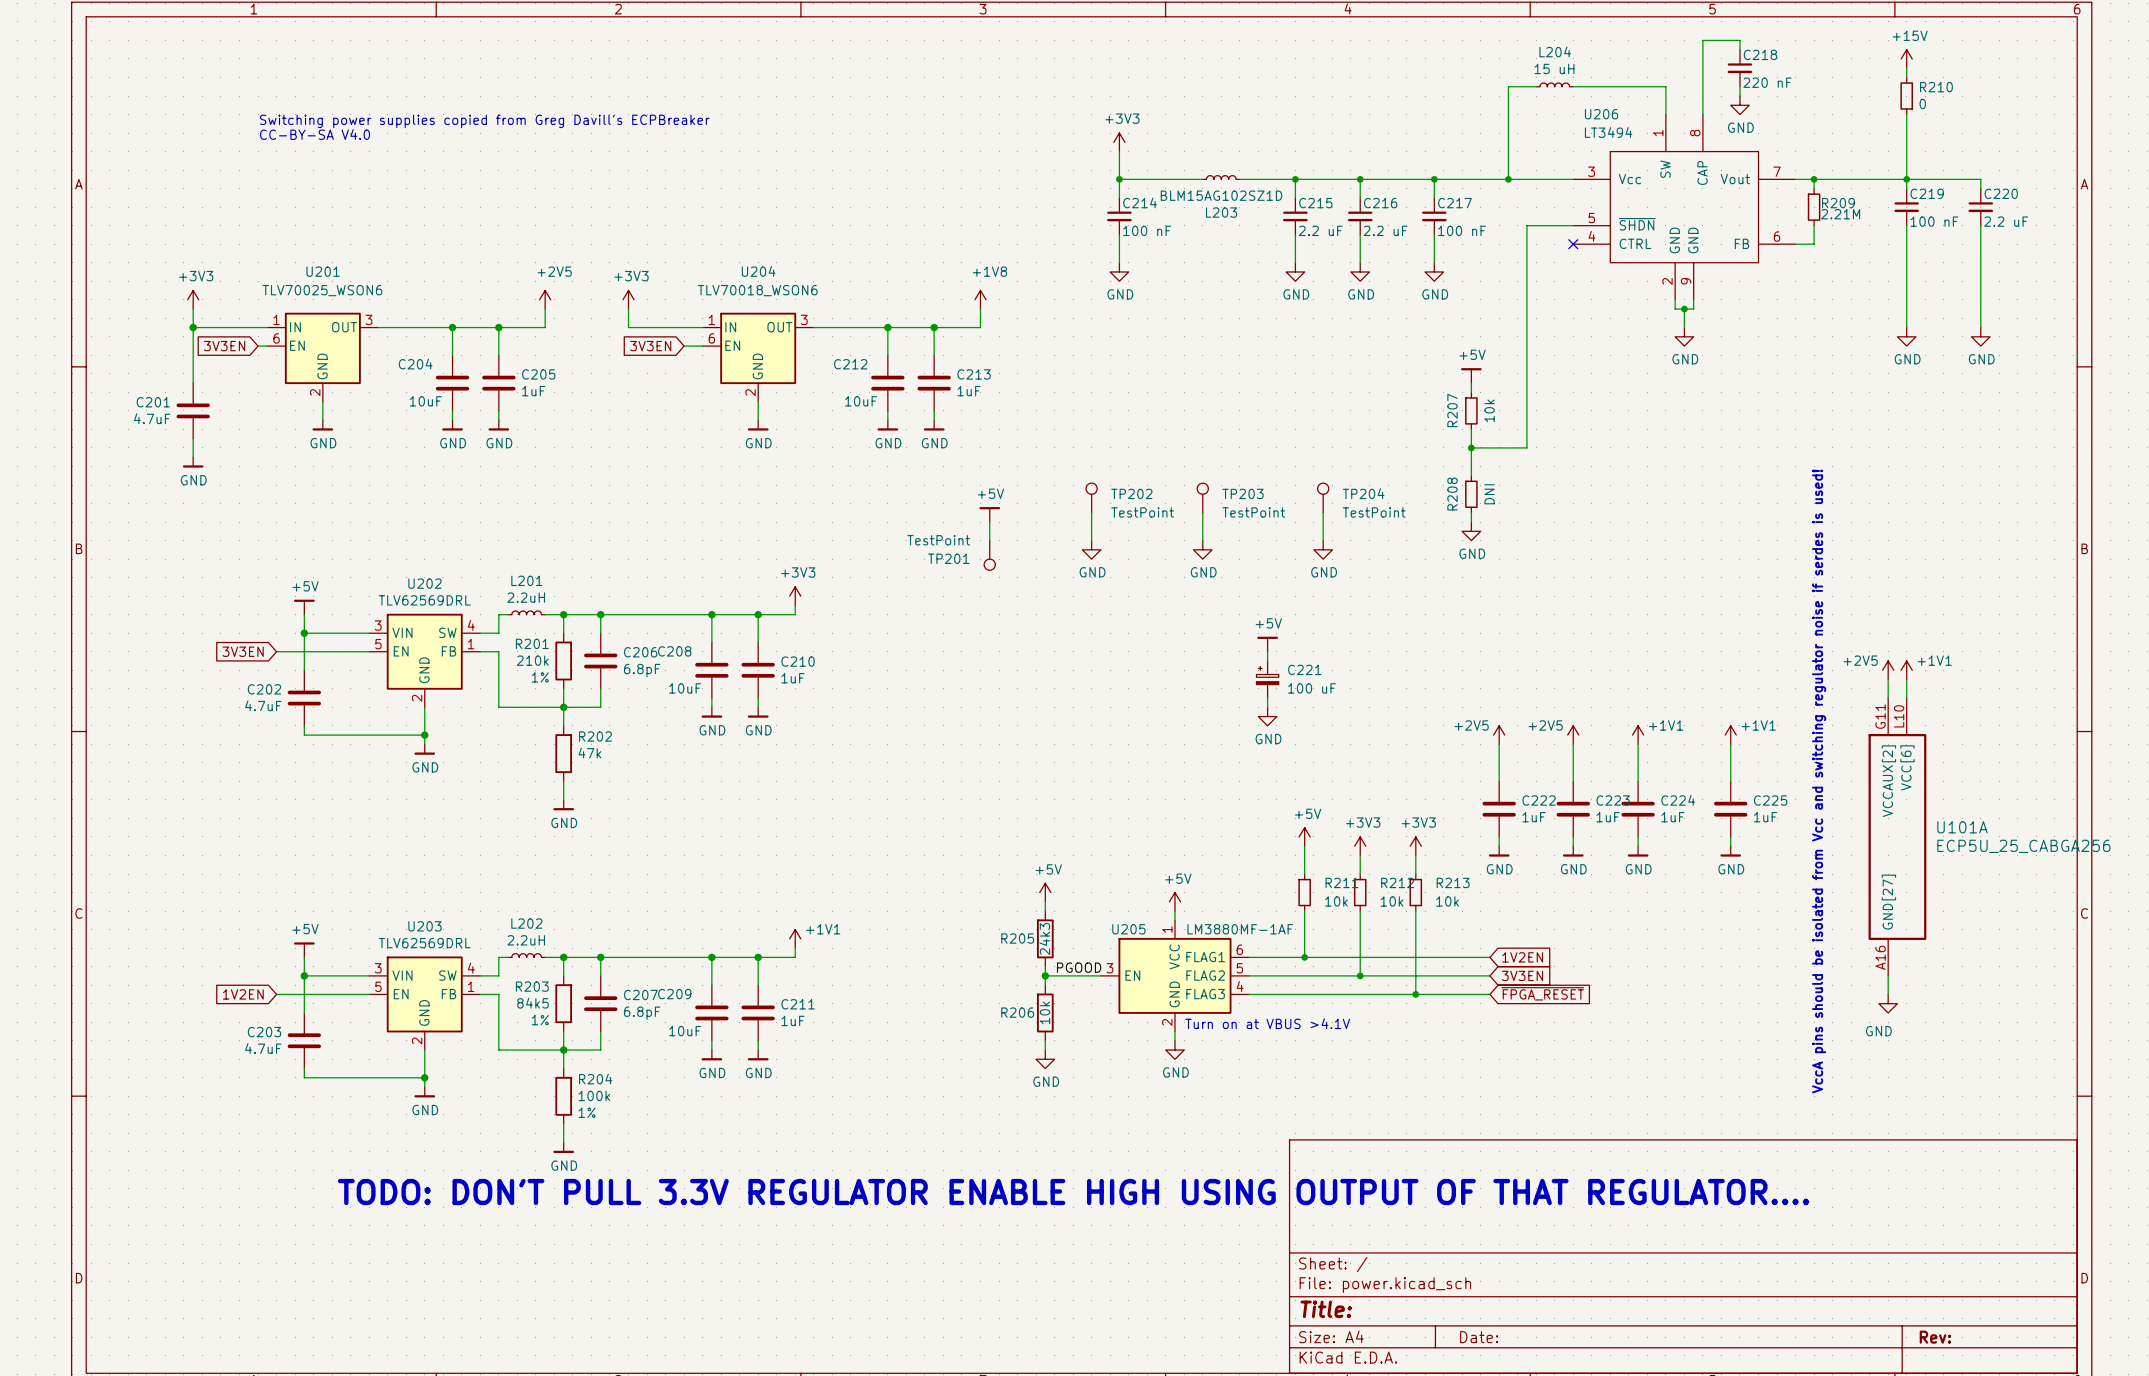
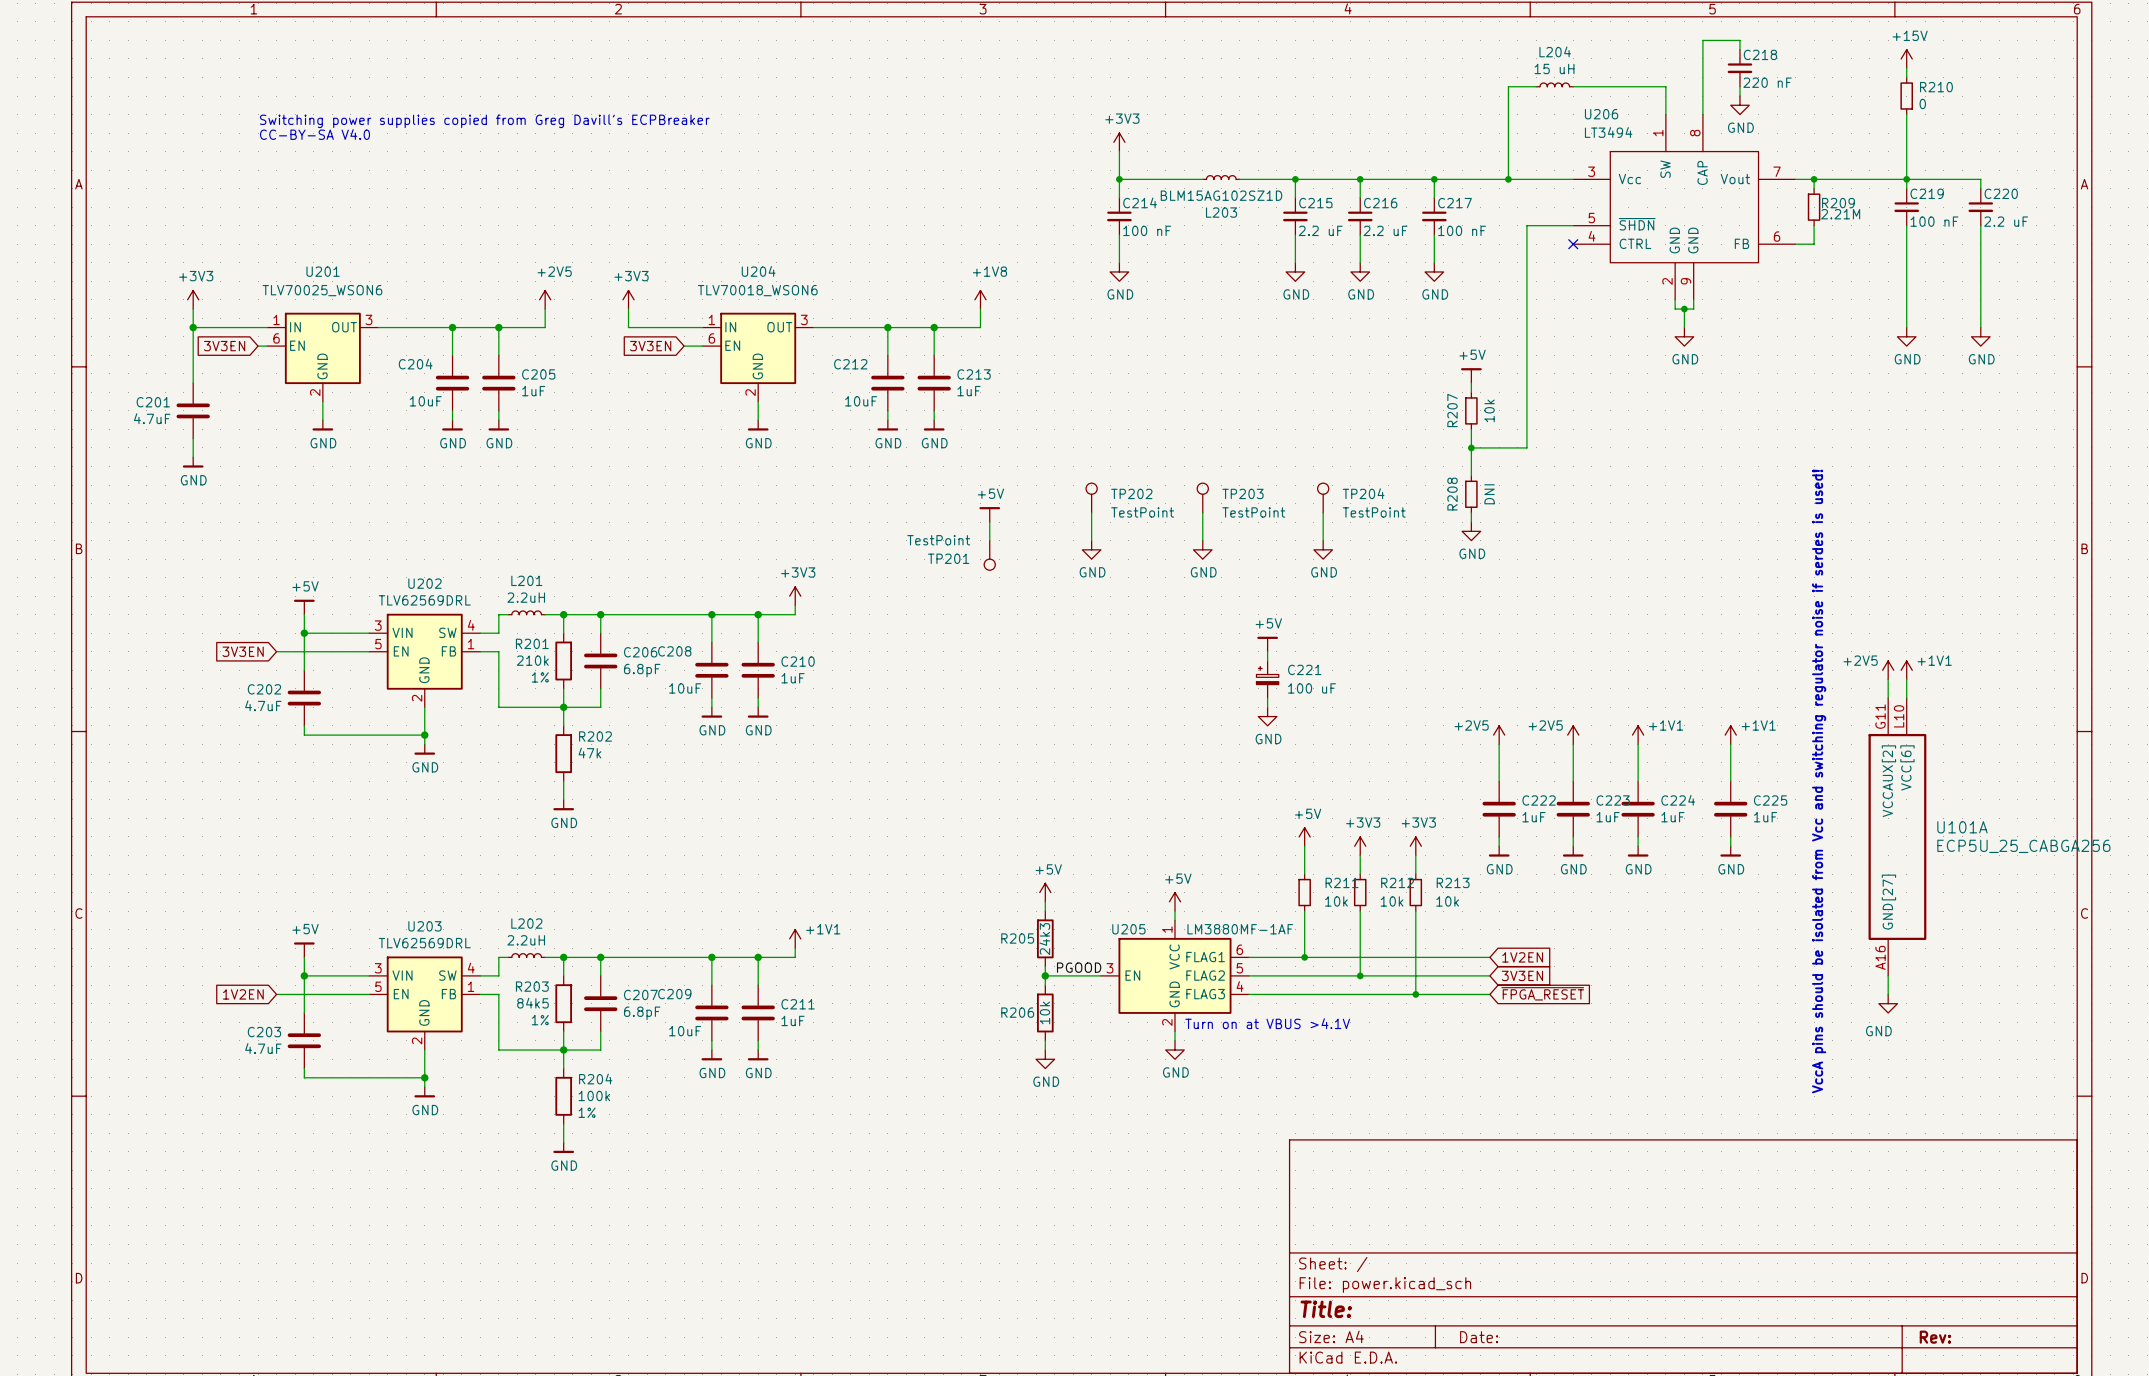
text: TODO: DON'T PULL 3.3V REGULATOR ENABLE HIGH USING OUTPUT OF THAT REGULATOR.... (1073, 1192) -> none

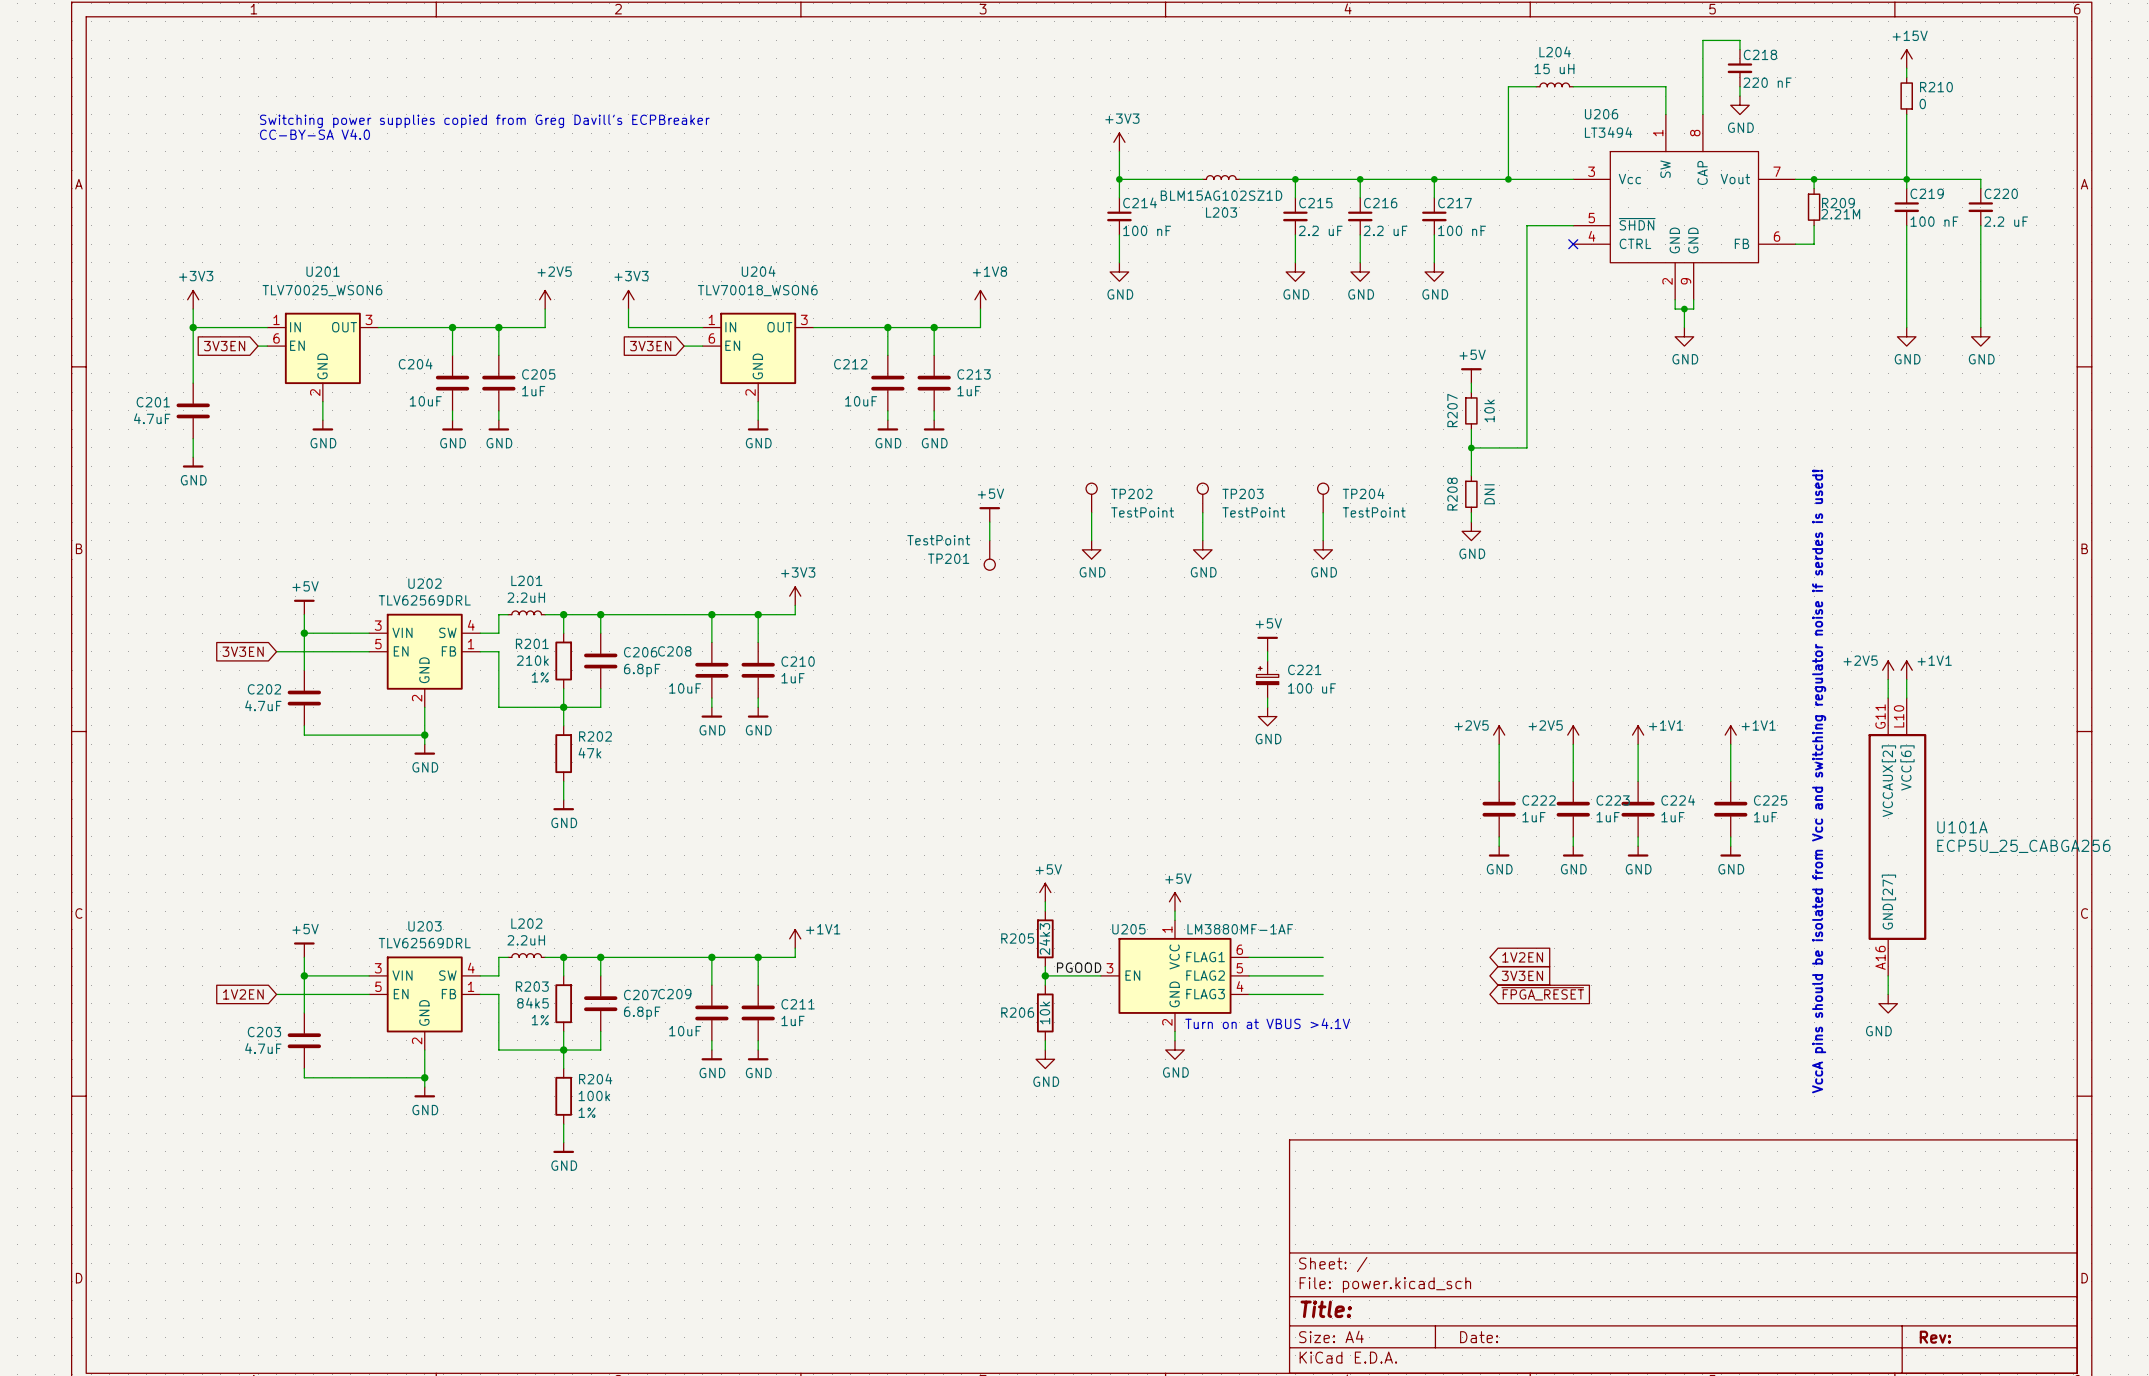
power symbol: +5V (1304, 836) -> none
wire: (1304, 846) (1304, 874) -> none
power symbol: +3V3 (1360, 846) -> none
power symbol: +3V3 (1415, 846) -> none
wire: (1360, 855) (1360, 874) -> none
wire: (1415, 855) (1415, 874) -> none
R211: 10k (1304, 892) -> none
R212: 10k (1360, 892) -> none
R213: 10k (1415, 892) -> none
wire: (1304, 911) (1304, 957) -> none
wire: (1360, 911) (1360, 975) -> none
wire: (1415, 911) (1415, 994) -> none
junction: (1304, 957) -> none
wire: (1323, 957) (1489, 957) -> none
wire: (1323, 975) (1489, 975) -> none
junction: (1360, 975) -> none
wire: (1323, 994) (1489, 994) -> none
junction: (1415, 994) -> none

